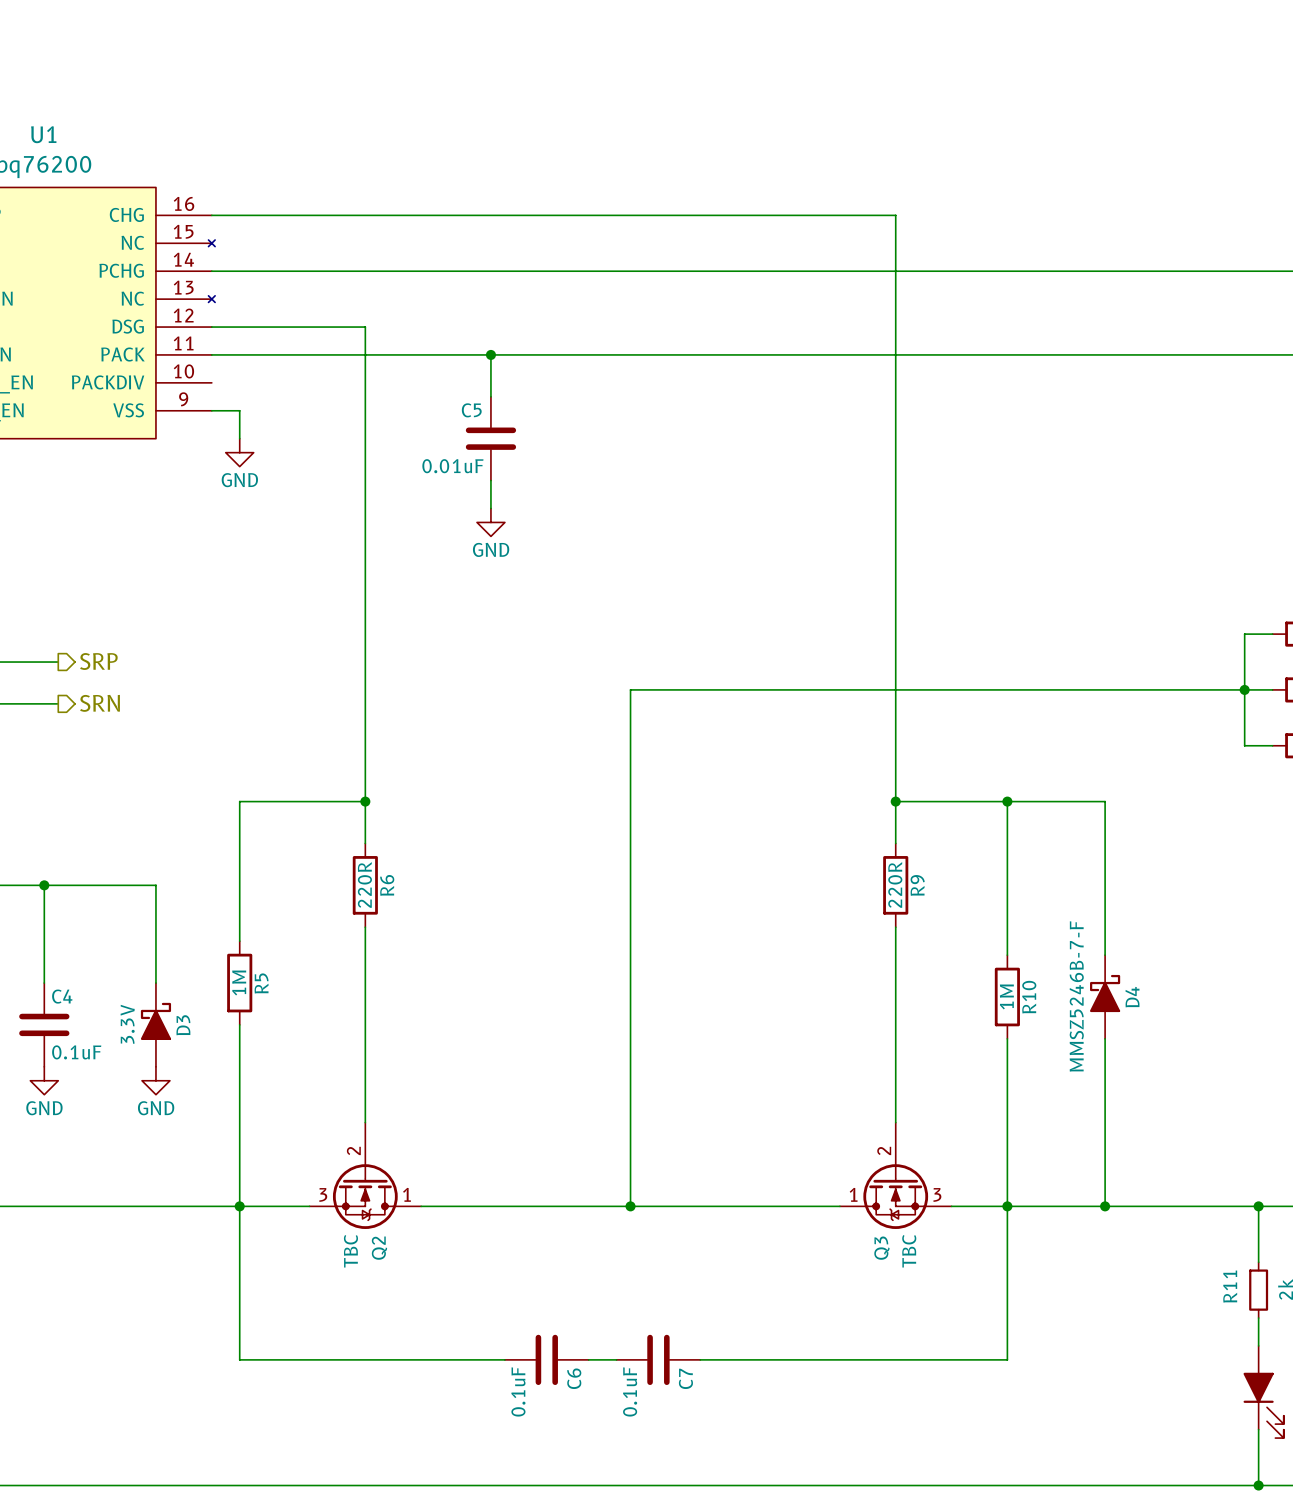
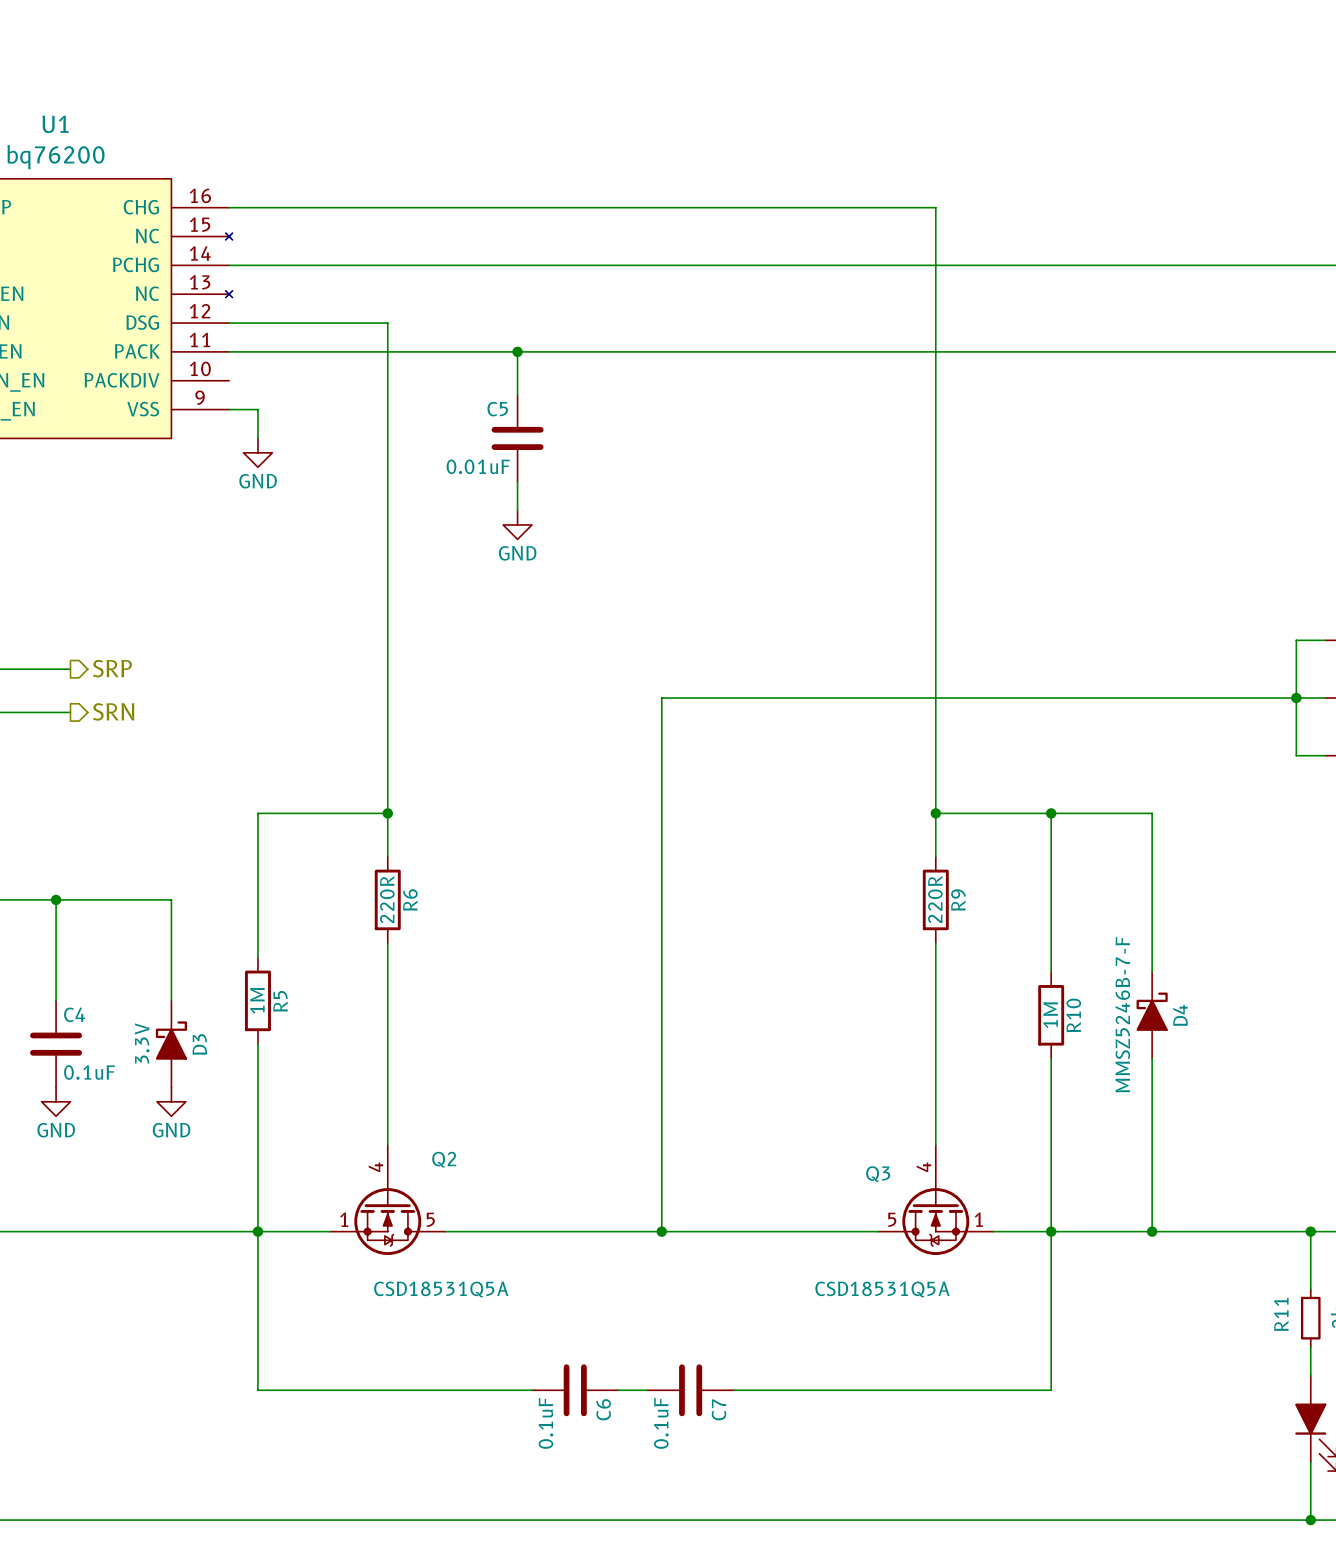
Q2 symbol: [309, 1122, 422, 1229] -> [330, 1145, 446, 1256]
Q3 symbol: [839, 1122, 952, 1229] -> [878, 1145, 994, 1256]
Q2 name position: Q2 (379, 1248) -> Q2 (444, 1159)
Q3 name position: Q3 (881, 1248) -> Q3 (878, 1174)
Q2 value: TBC (350, 1251) -> CSD18531Q5A (441, 1289)
Q3 value: TBC (909, 1251) -> CSD18531Q5A (882, 1289)

